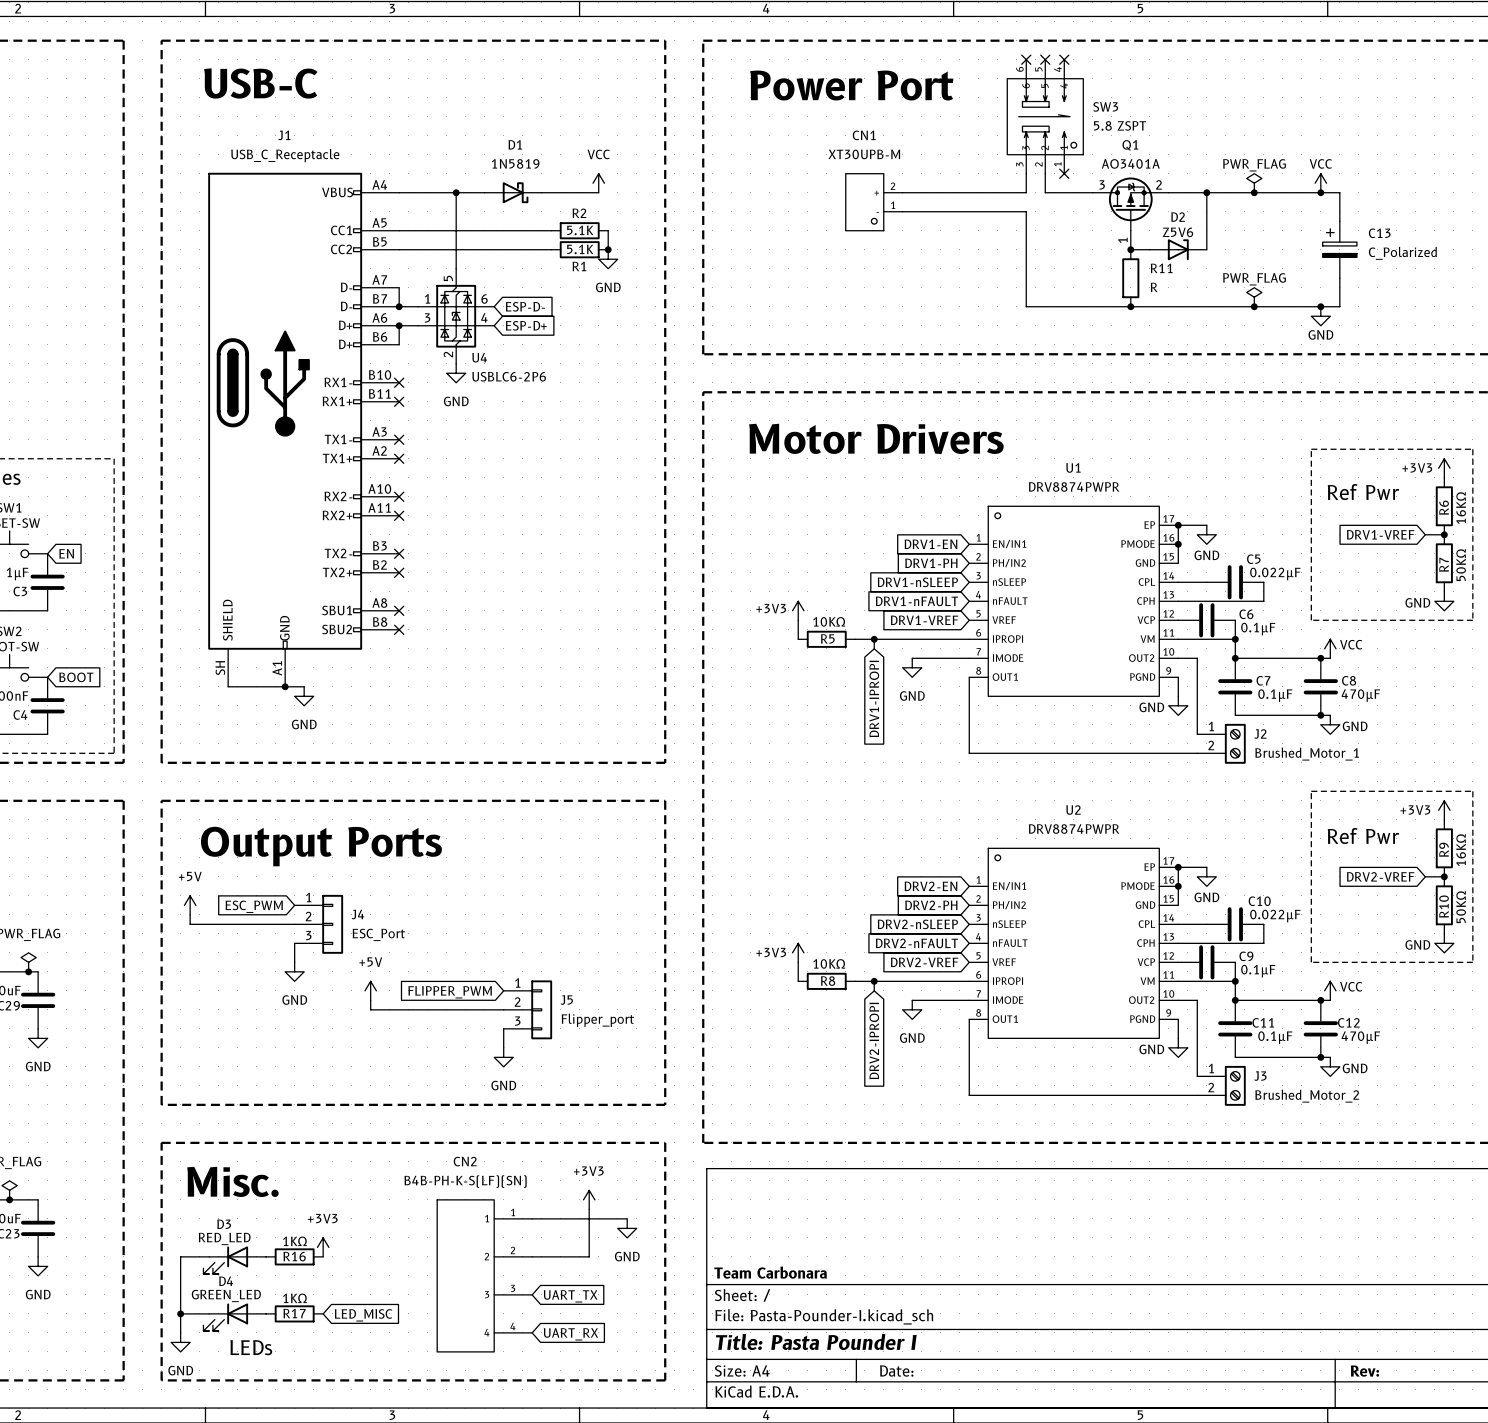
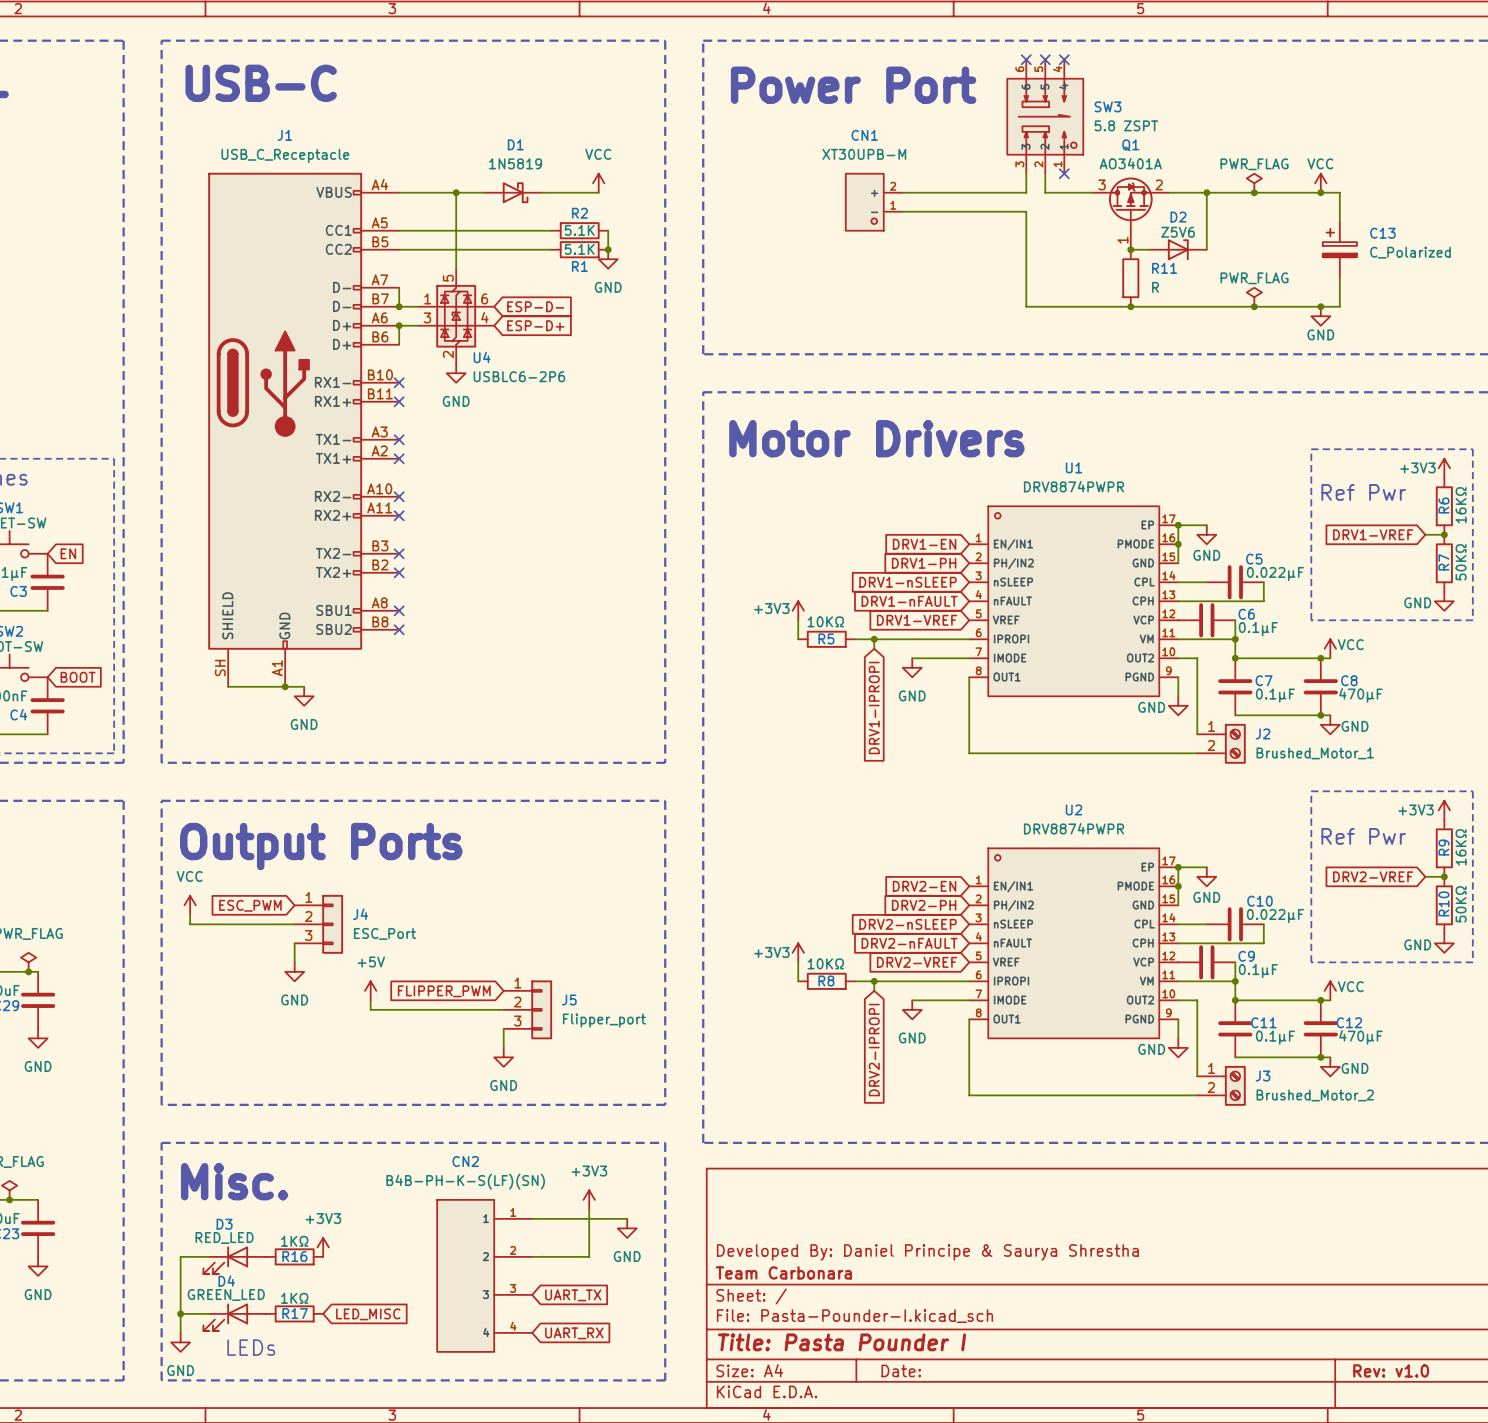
power symbol: +5V (190, 905) -> VCC (190, 905)
title block: none -> Developed By: Daniel Principe & Saurya Shrestha (927, 1252)
title block: Rev: (1364, 1371) -> Rev: v1.0 (1391, 1370)

